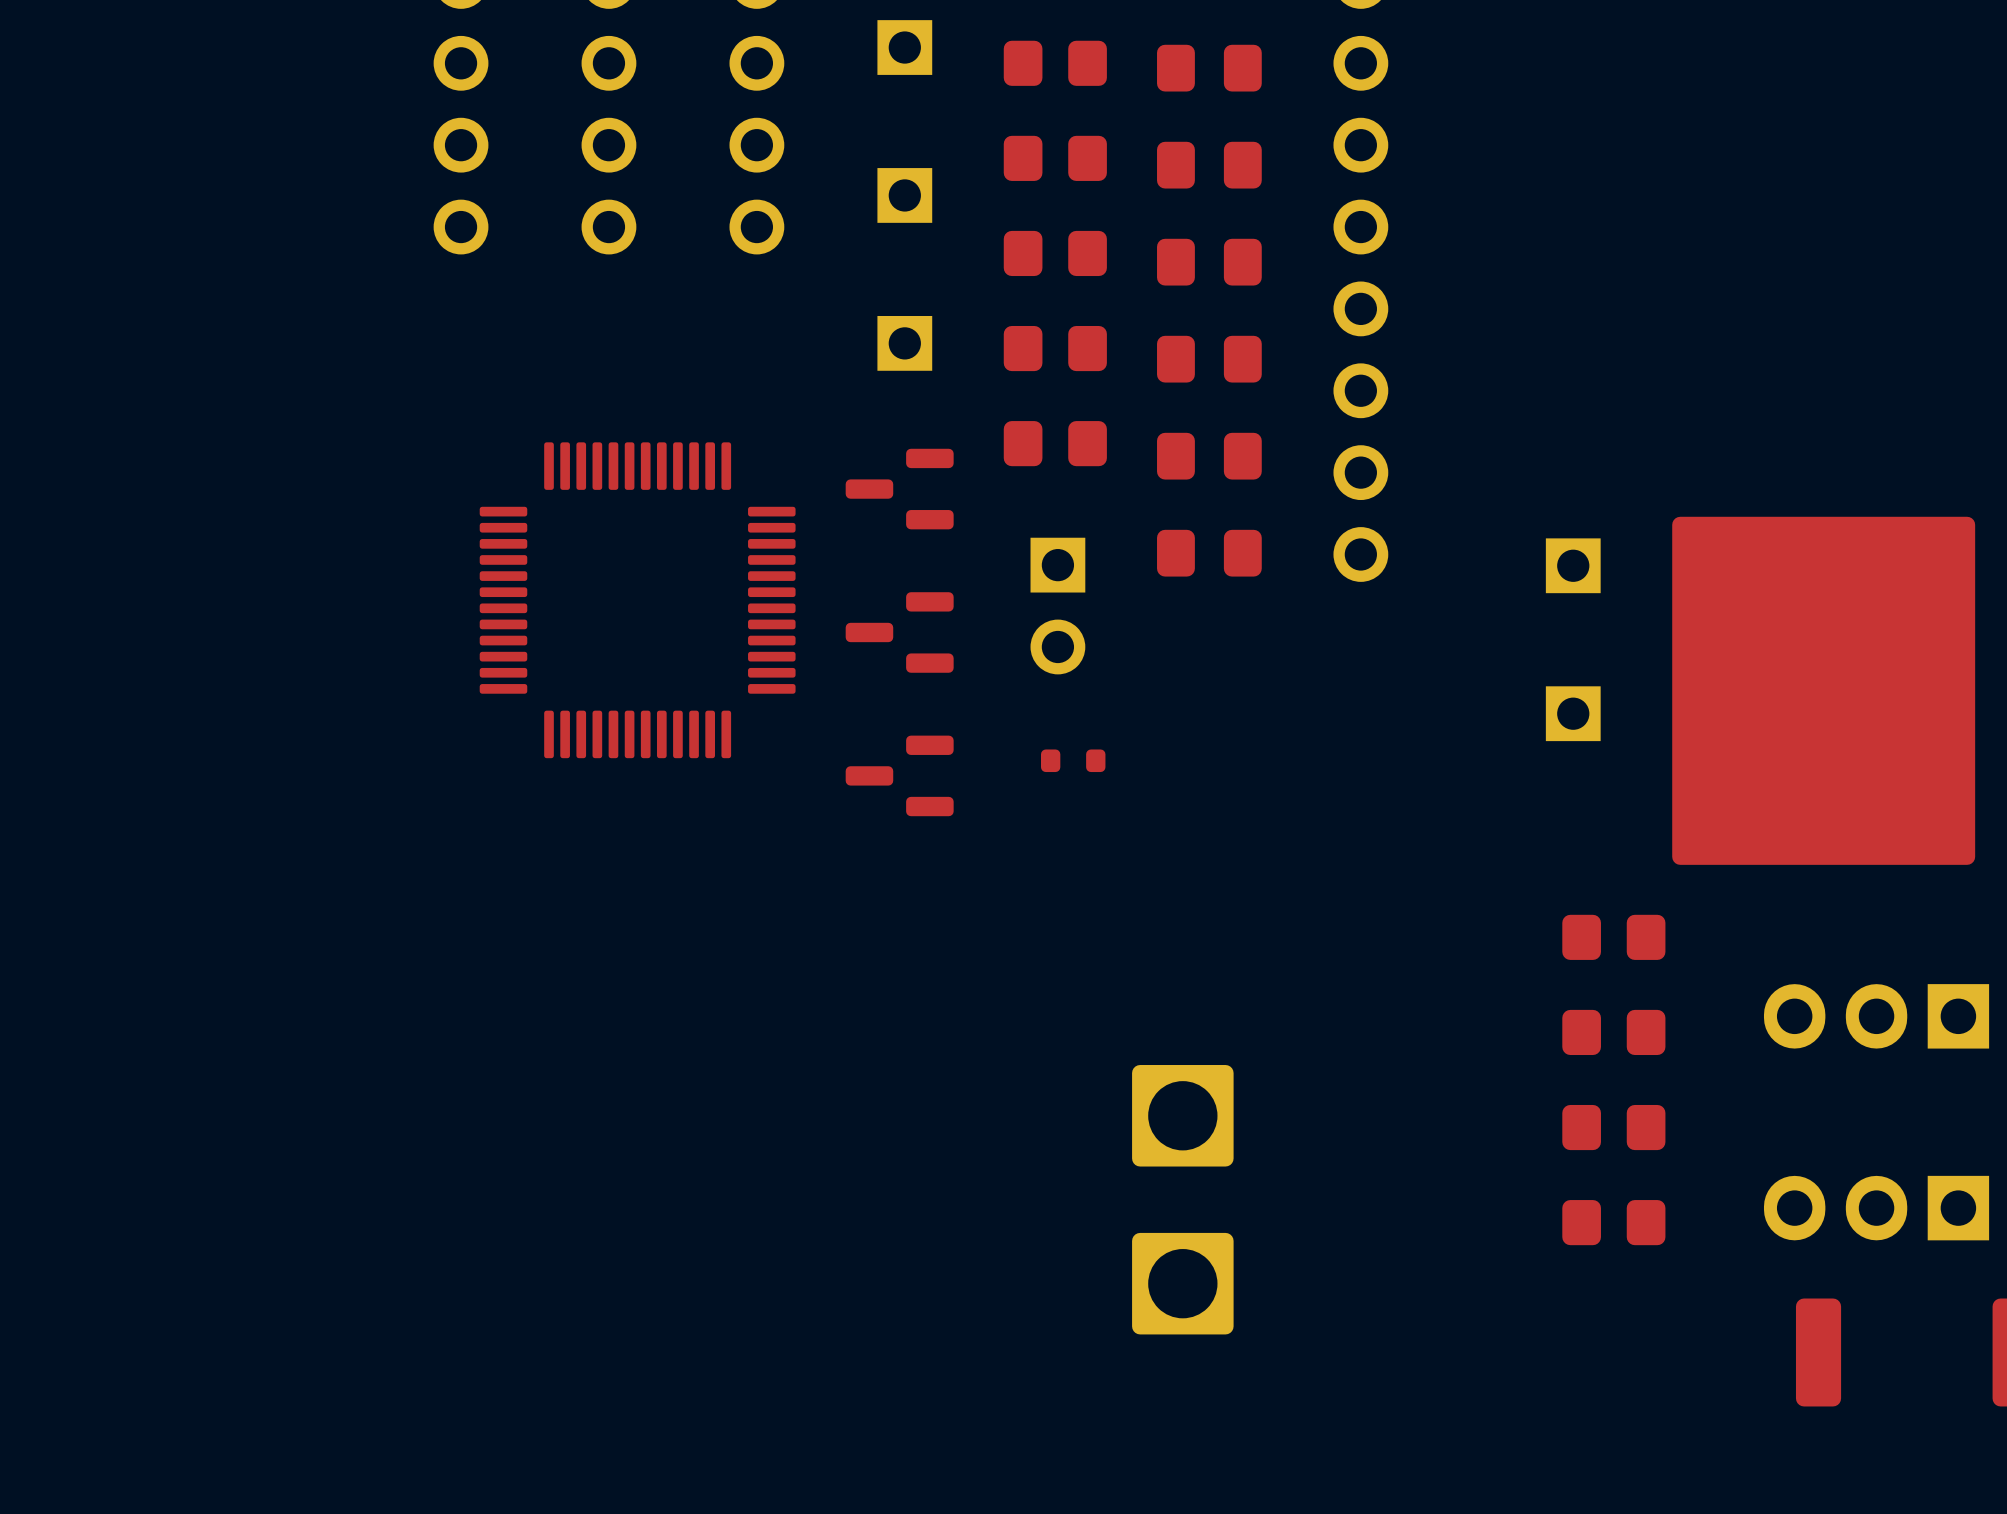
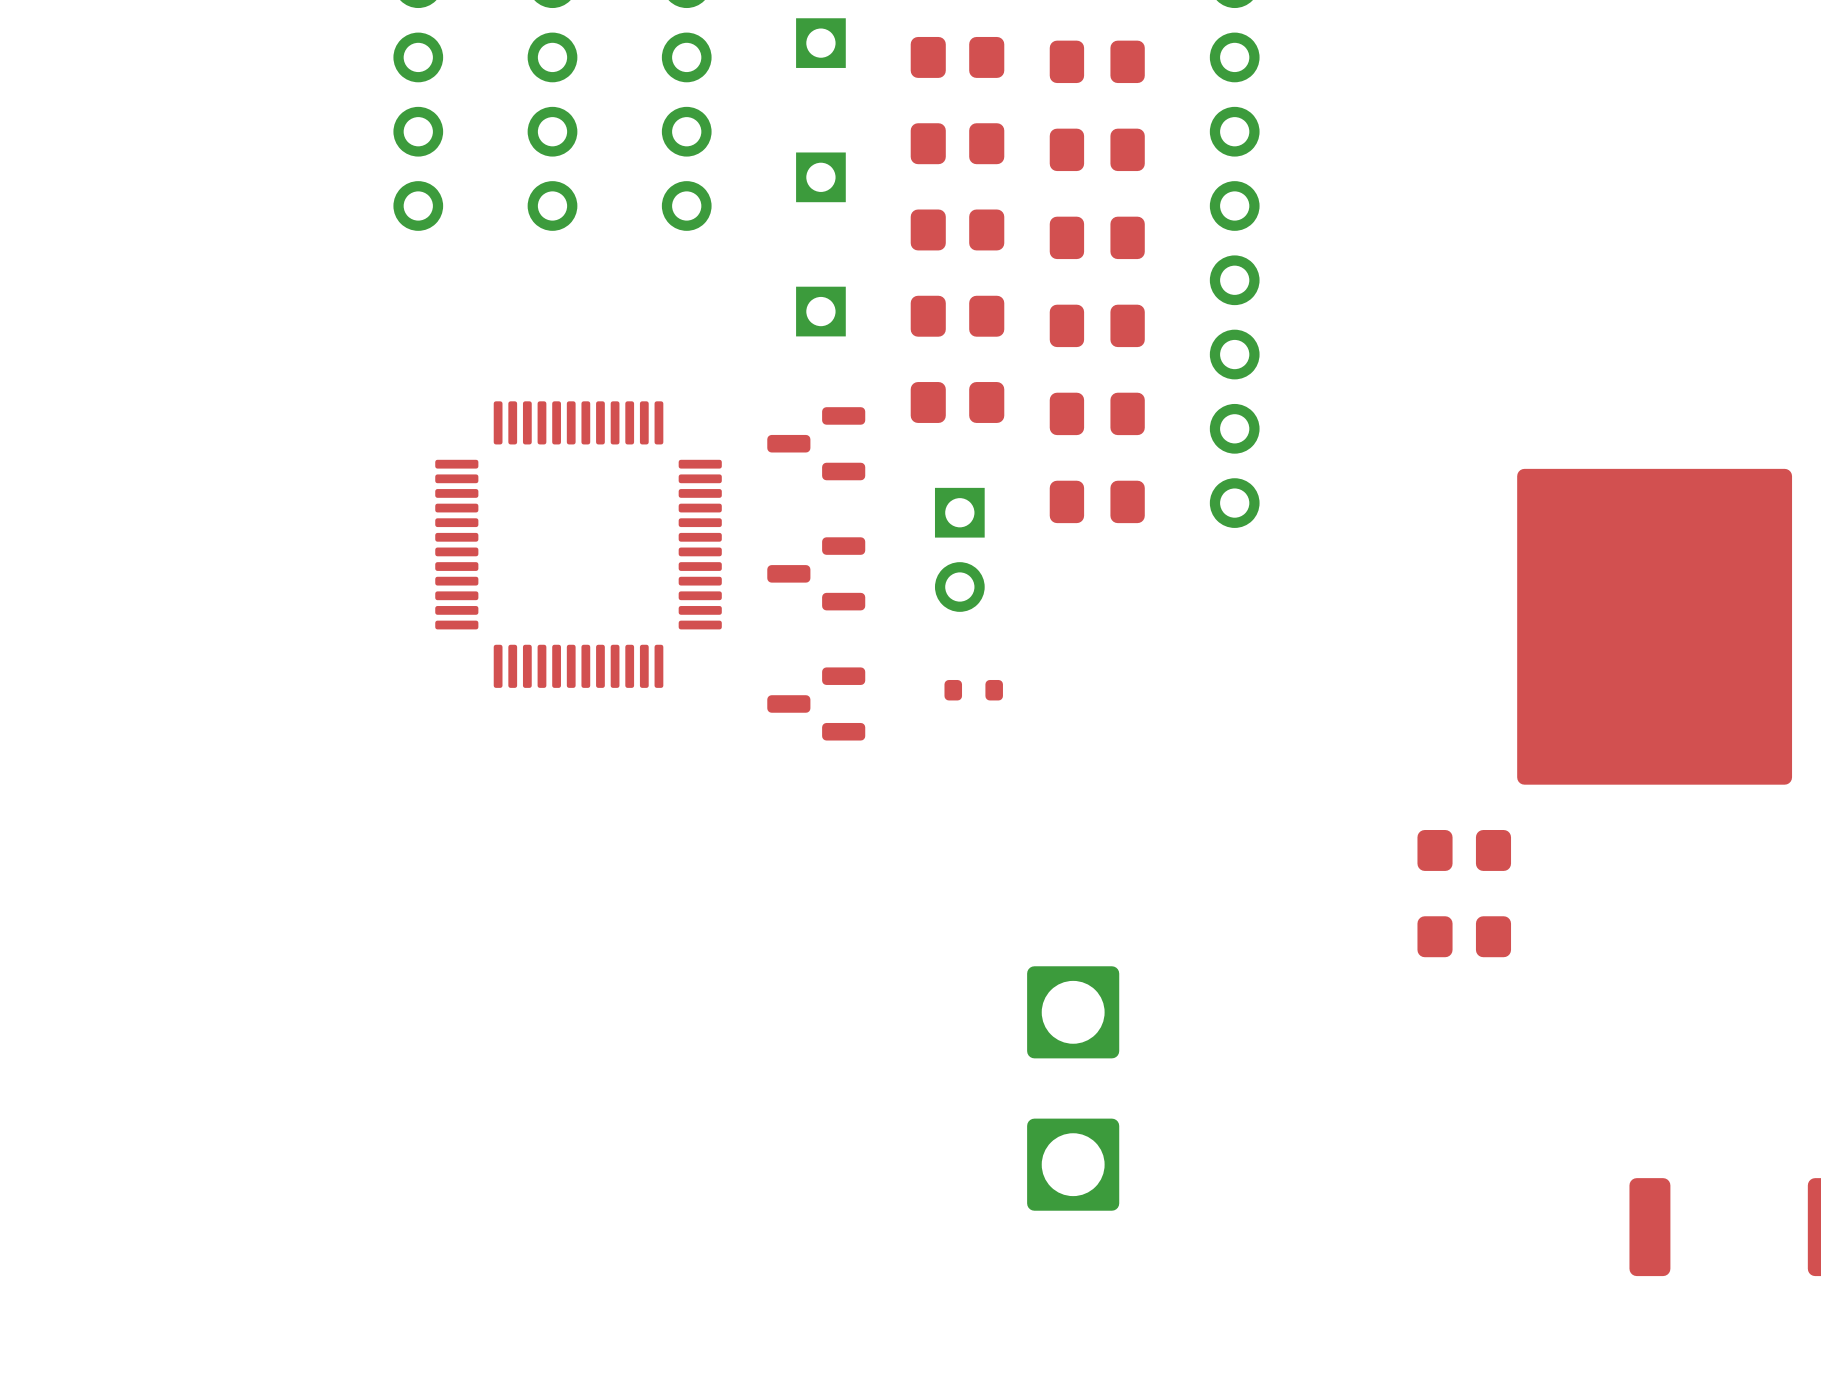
part: (1573, 565) -> none
part: (1573, 713) -> none
part: (1876, 1016) -> none
part: (1613, 1127) -> none
part: (1876, 1208) -> none
part: (1613, 1222) -> none

